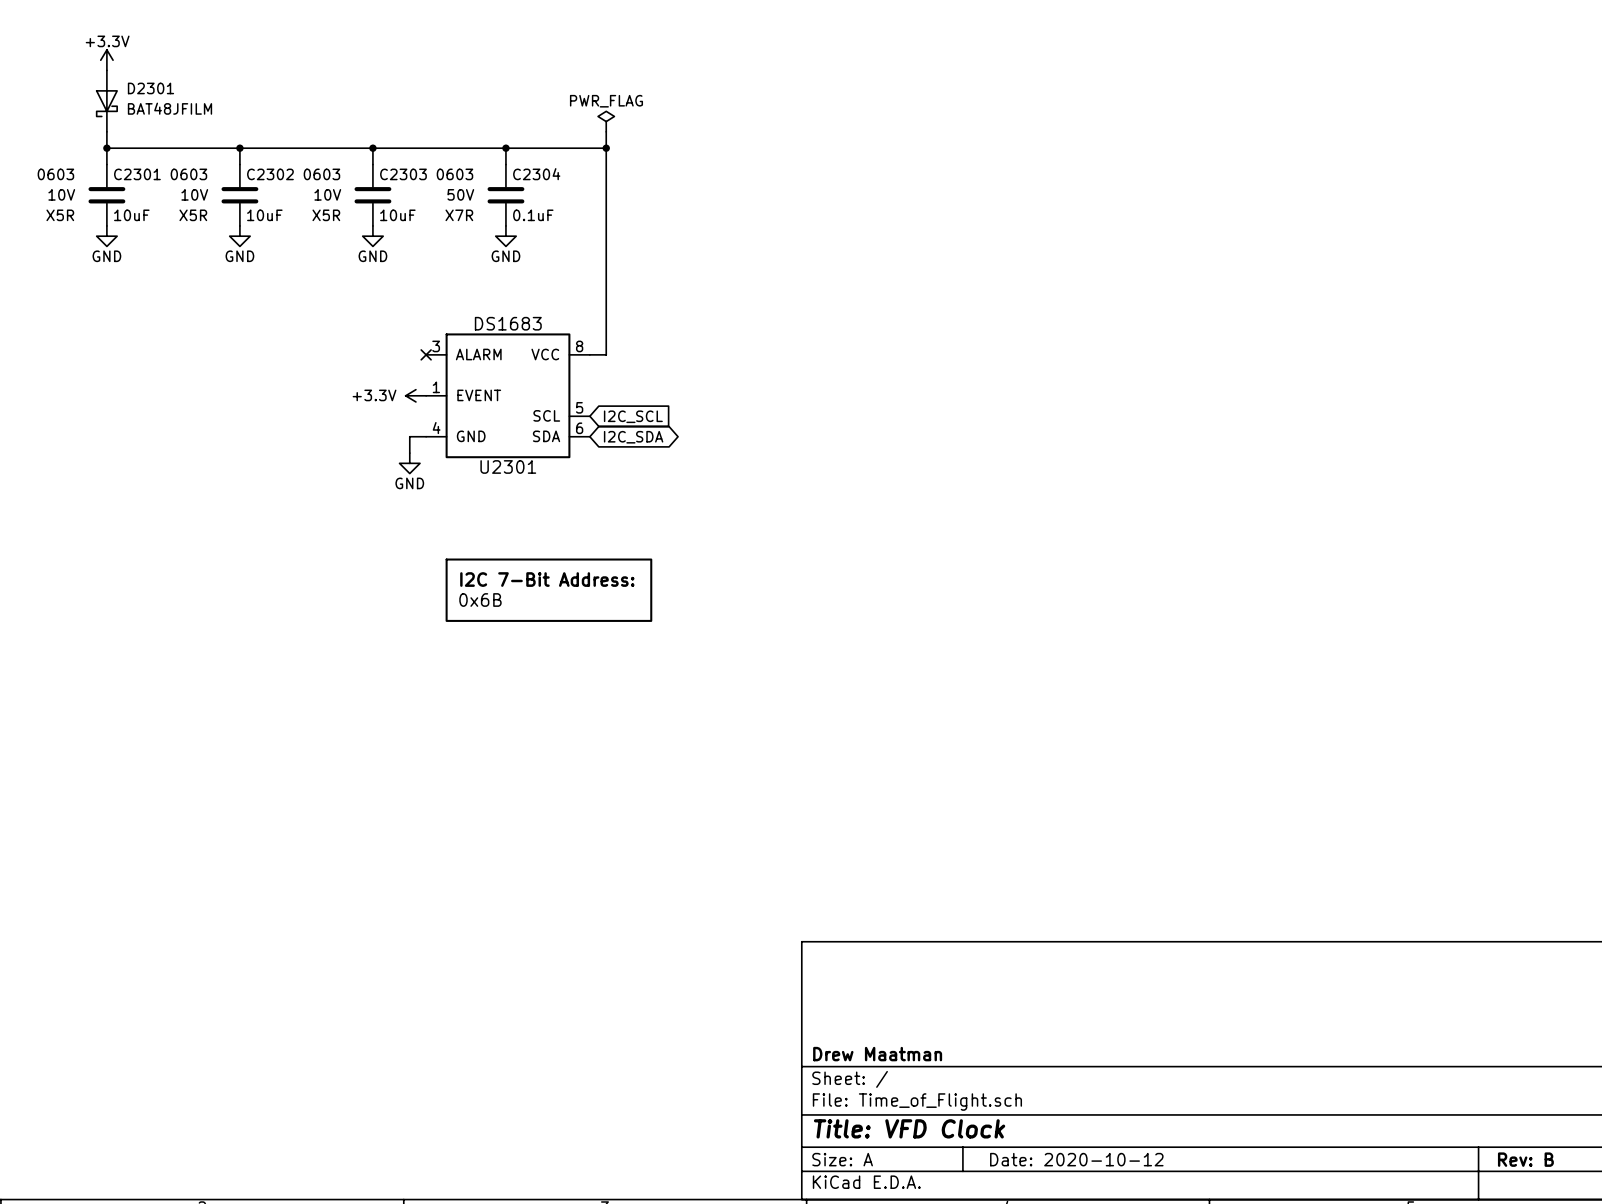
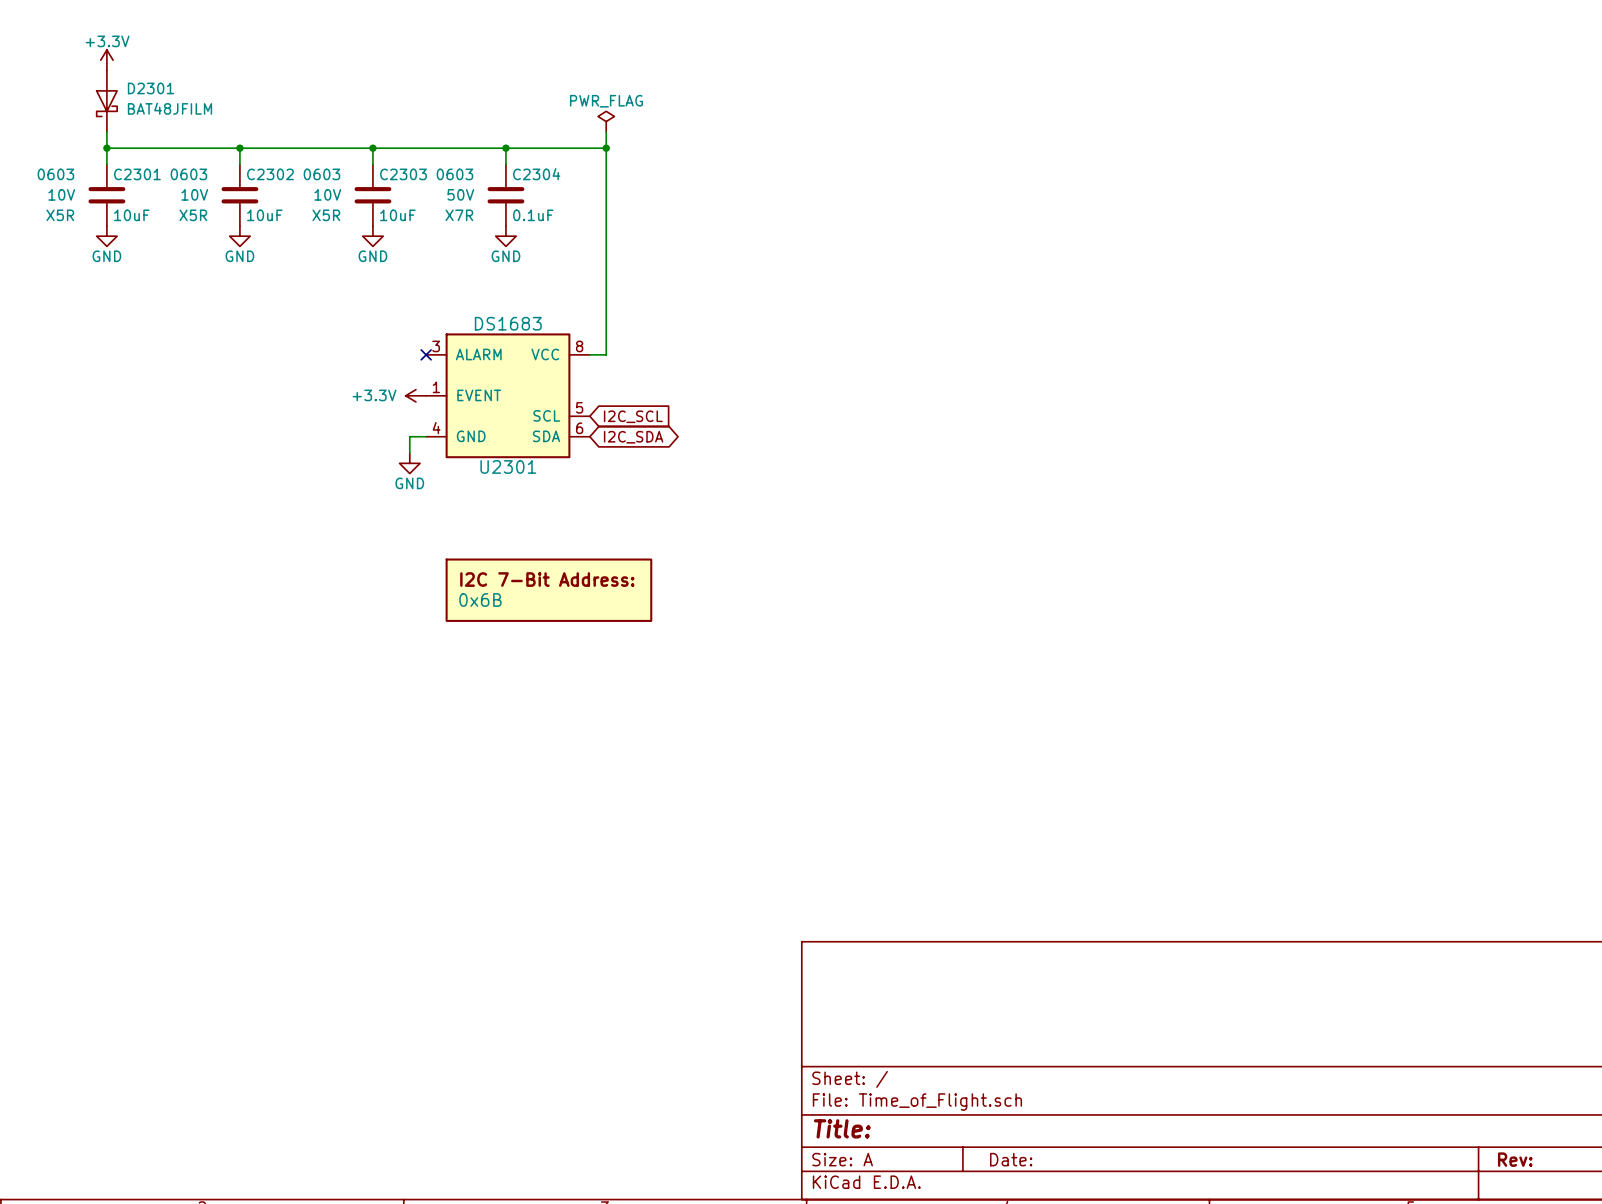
title block: Drew Maatman (877, 1054) -> none
title block: Title: VFD Clock (909, 1128) -> Title: (842, 1128)
title block: Date: 2020-10-12 (1076, 1159) -> Date: (1011, 1159)
title block: Rev: B (1525, 1159) -> Rev: (1515, 1159)

